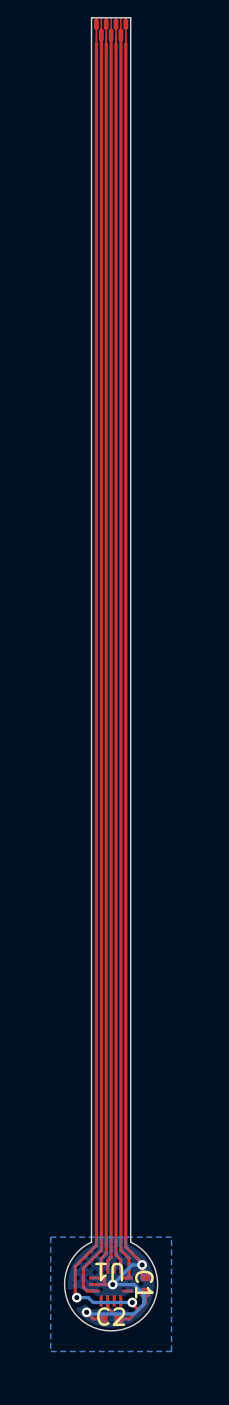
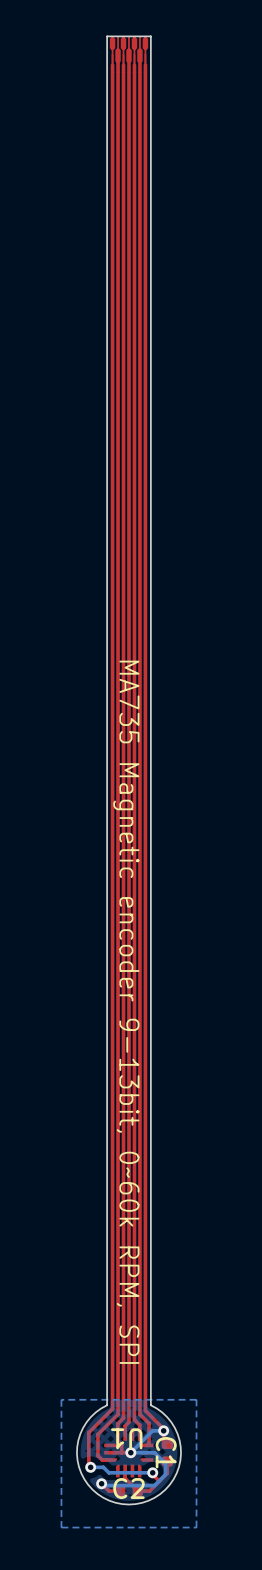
text: none -> MA735 Magnetic encoder 9-13bit, 0~60k RPM, SPI (126, 1012)

